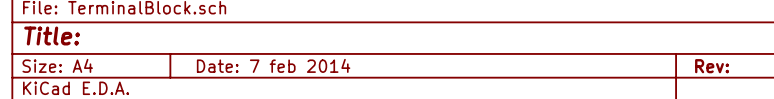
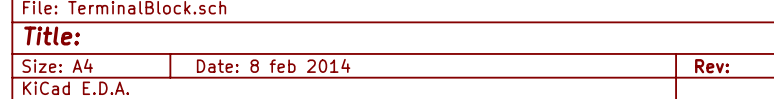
title block: Date: 7 feb 2014 (273, 65) -> Date: 8 feb 2014 (273, 65)

